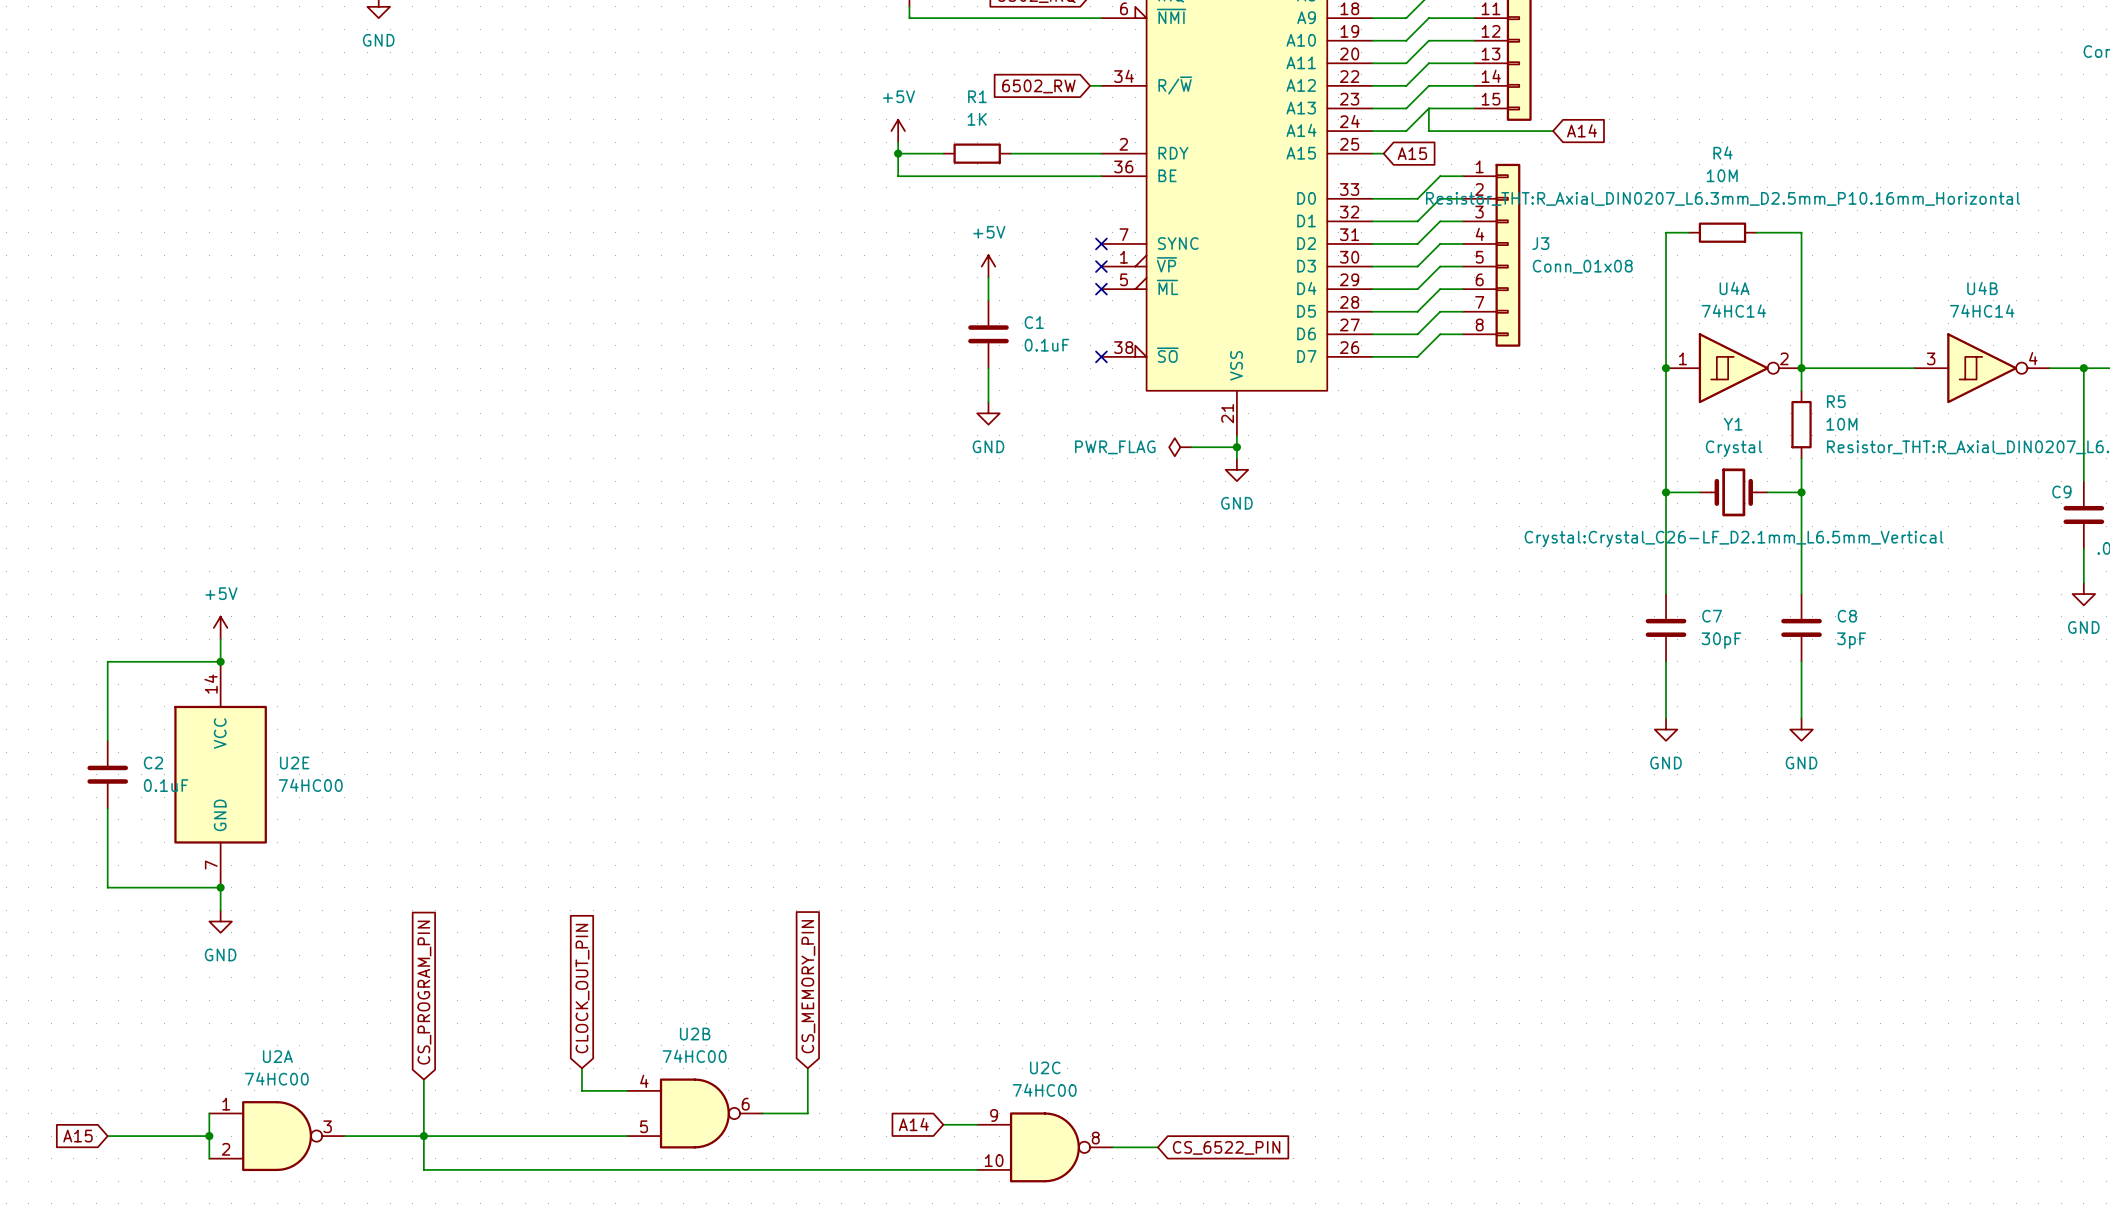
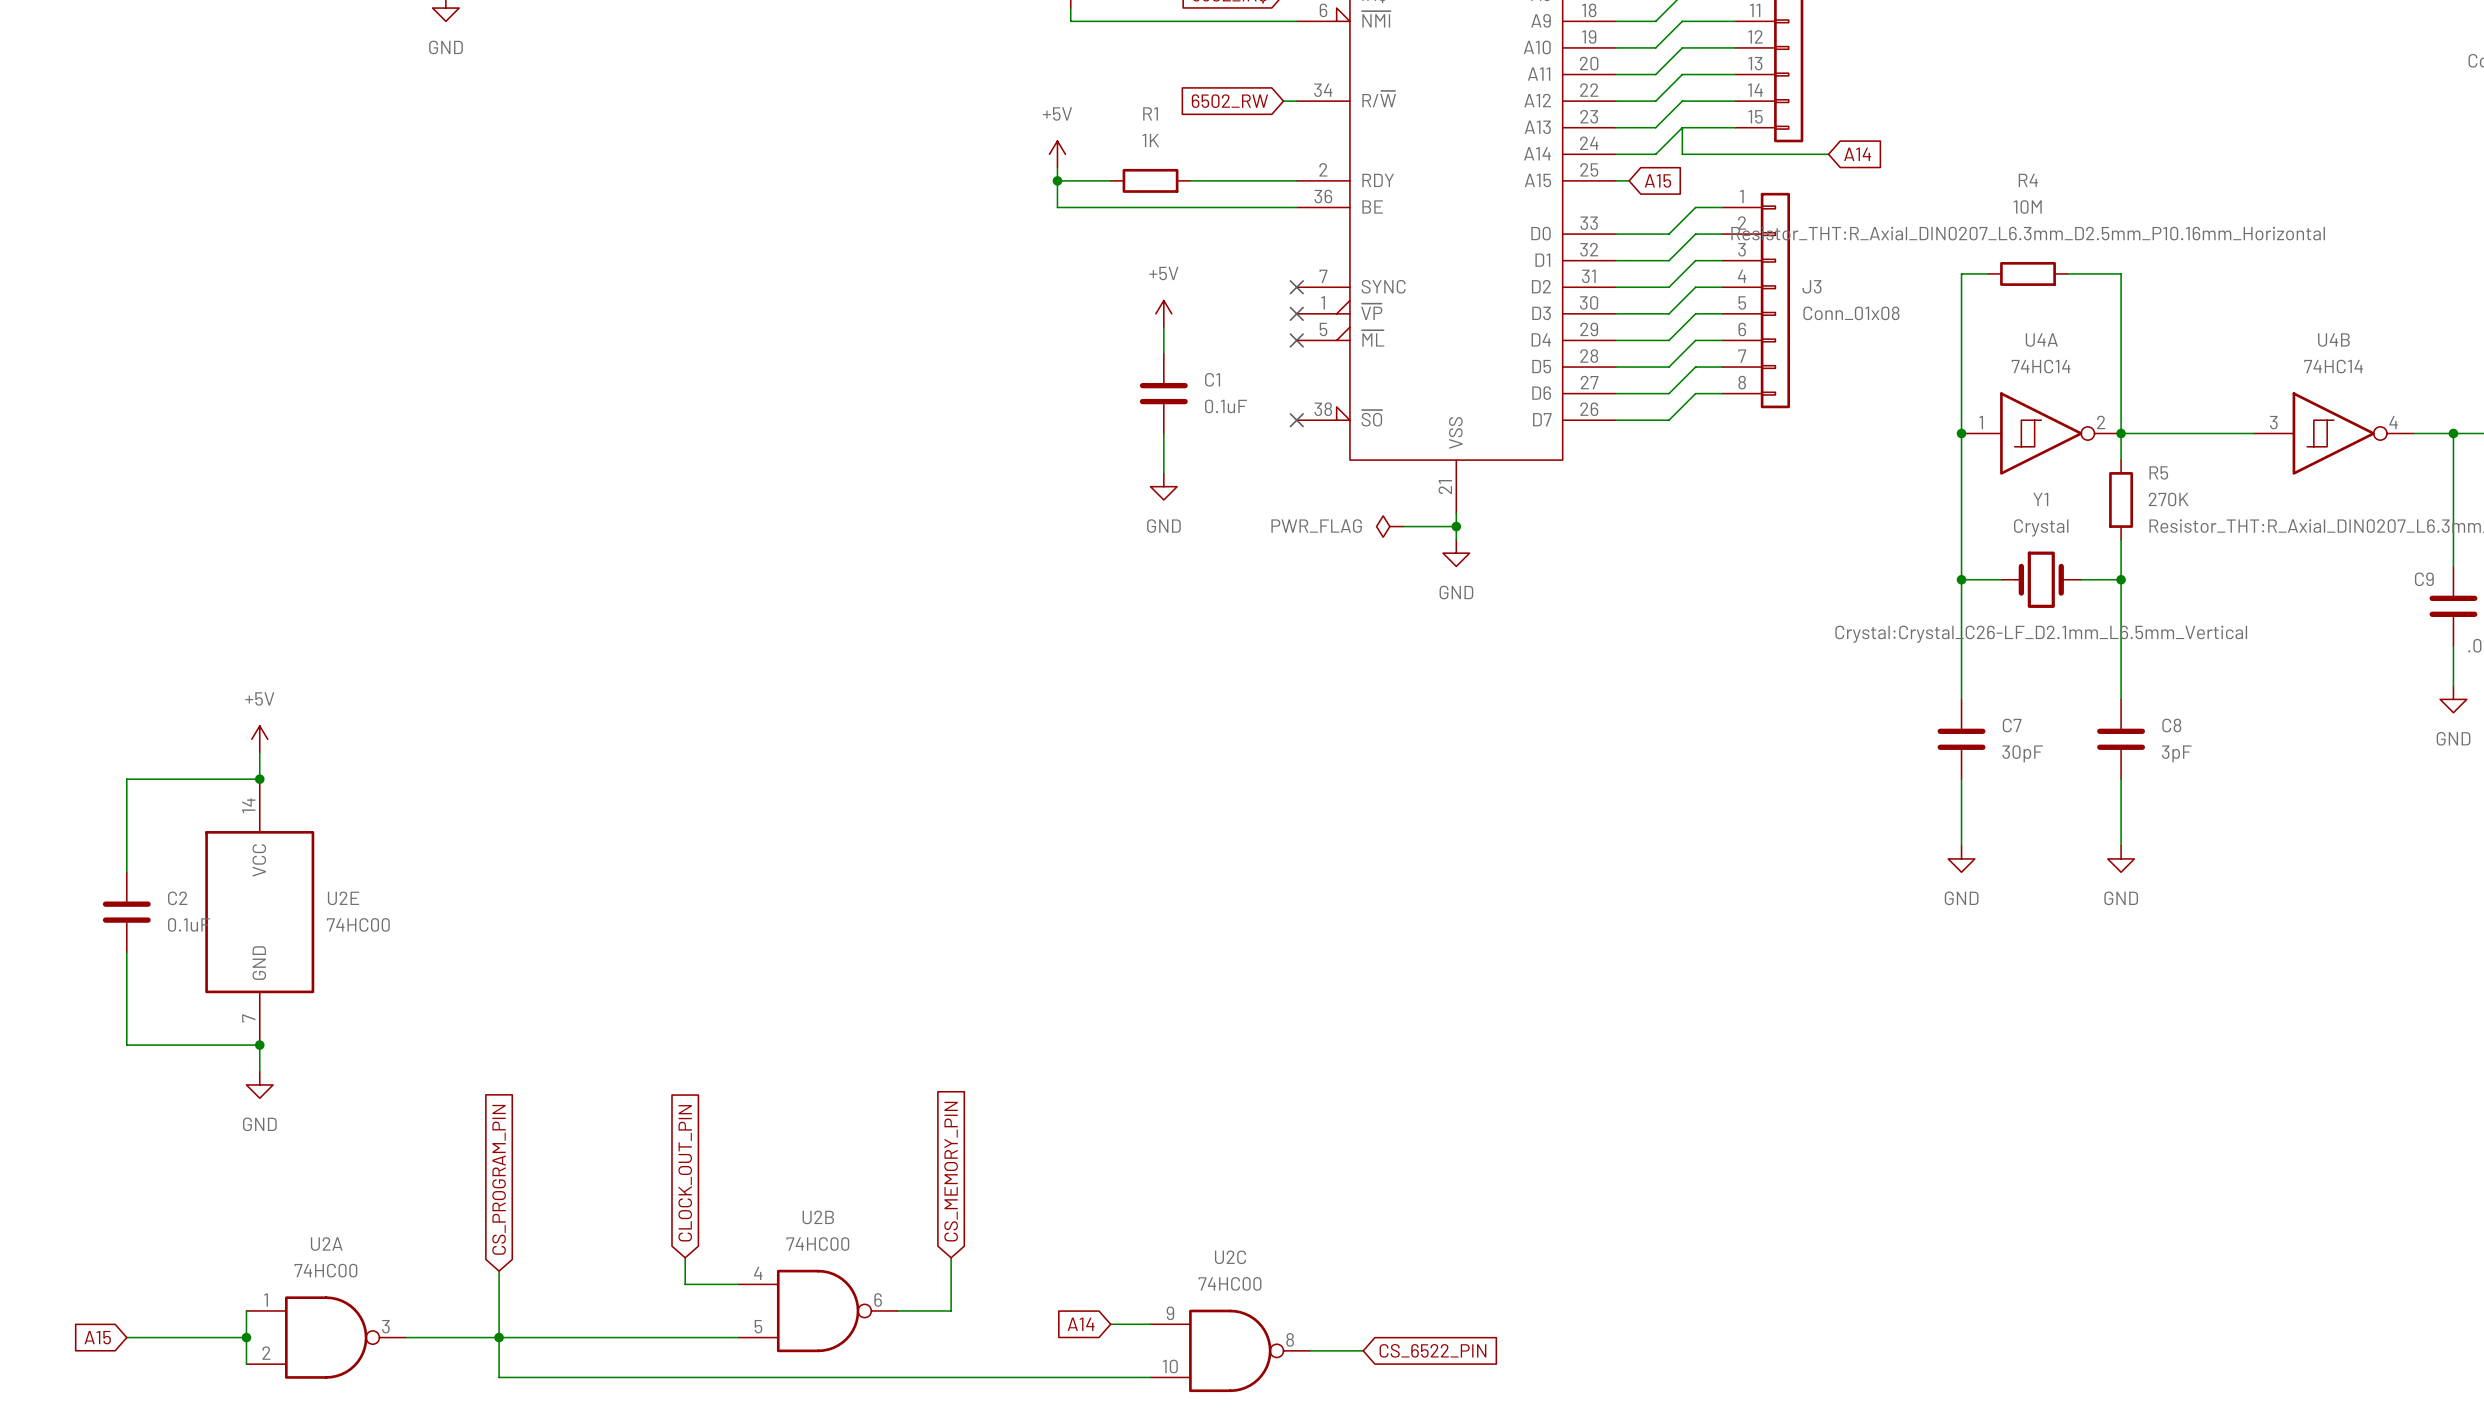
R5 value: 10M (1841, 424) -> 270K (2168, 499)

